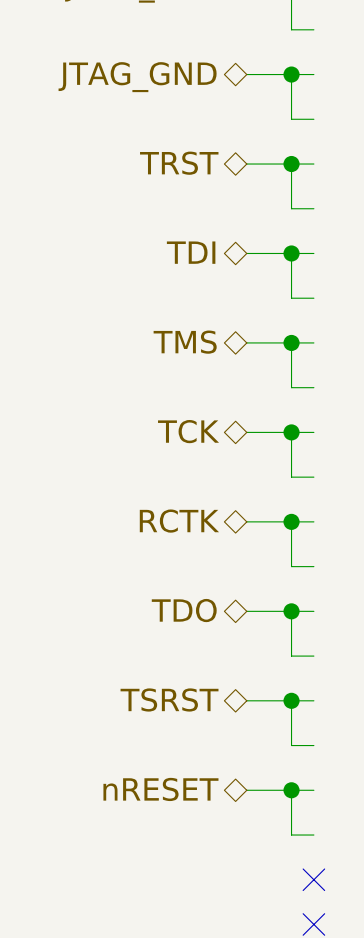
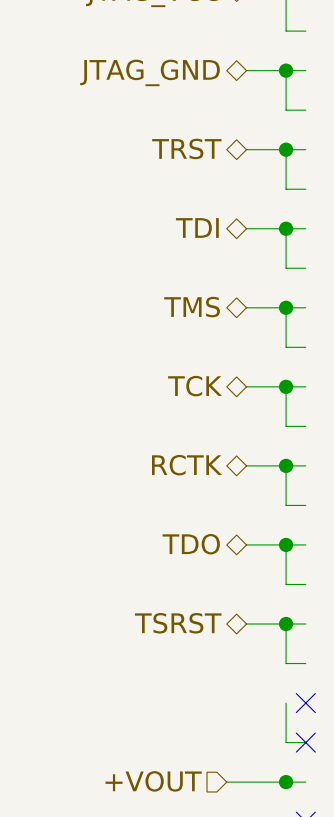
hierarchical label: nRESET (160, 789) -> none
wire: (246, 790) (313, 790) -> none
junction position: (291, 790) -> (286, 782)
no-connect mark: none -> (305, 703)
no-connect mark: none -> (305, 742)
hierarchical label: none -> +VOUT (153, 781)
wire: none -> (226, 782) (305, 782)
no-connect mark: (313, 879) -> none

